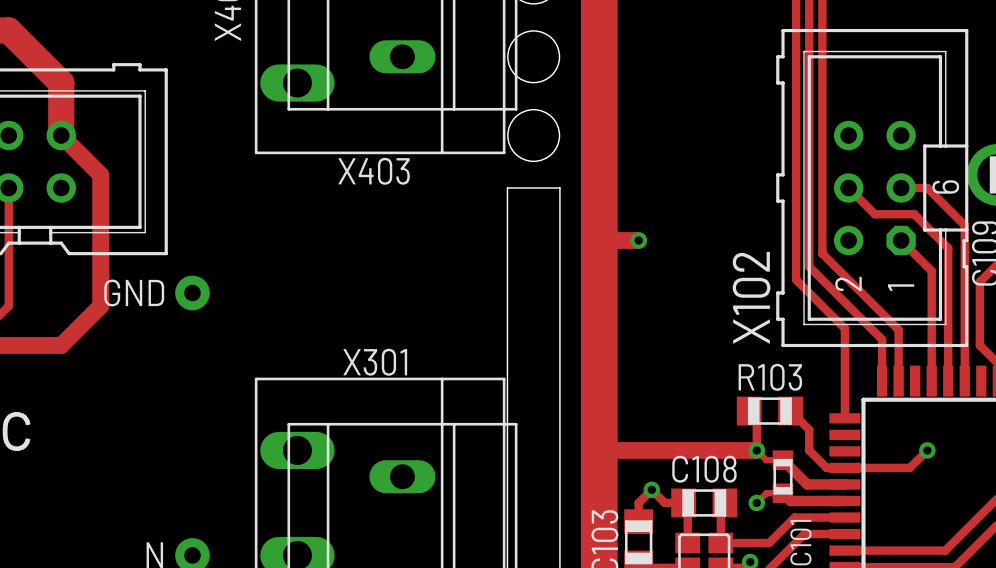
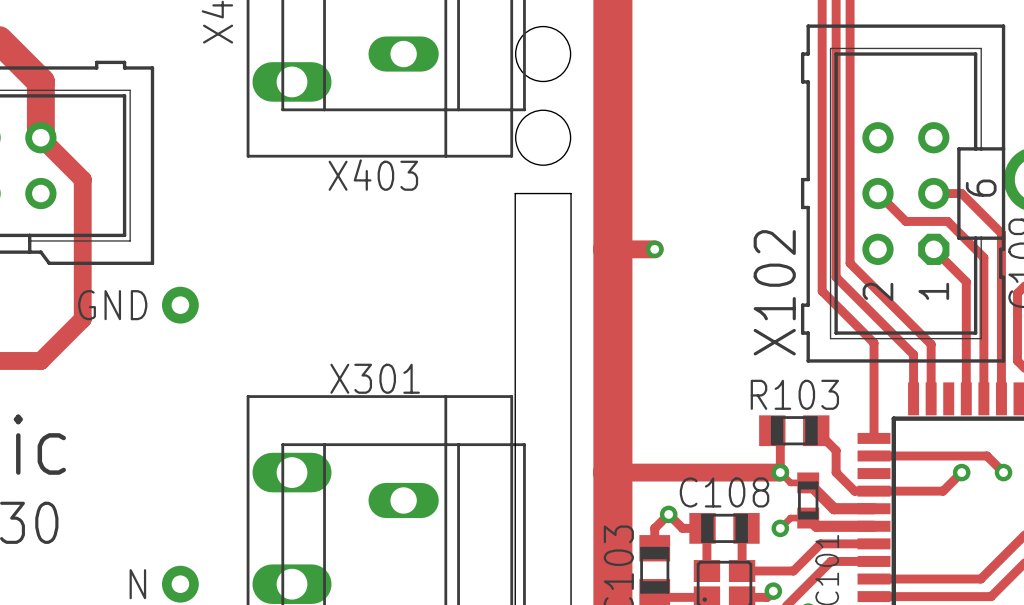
track: none -> (874, 455) (986, 455) (1003, 472)
via: none -> (1003, 472)

